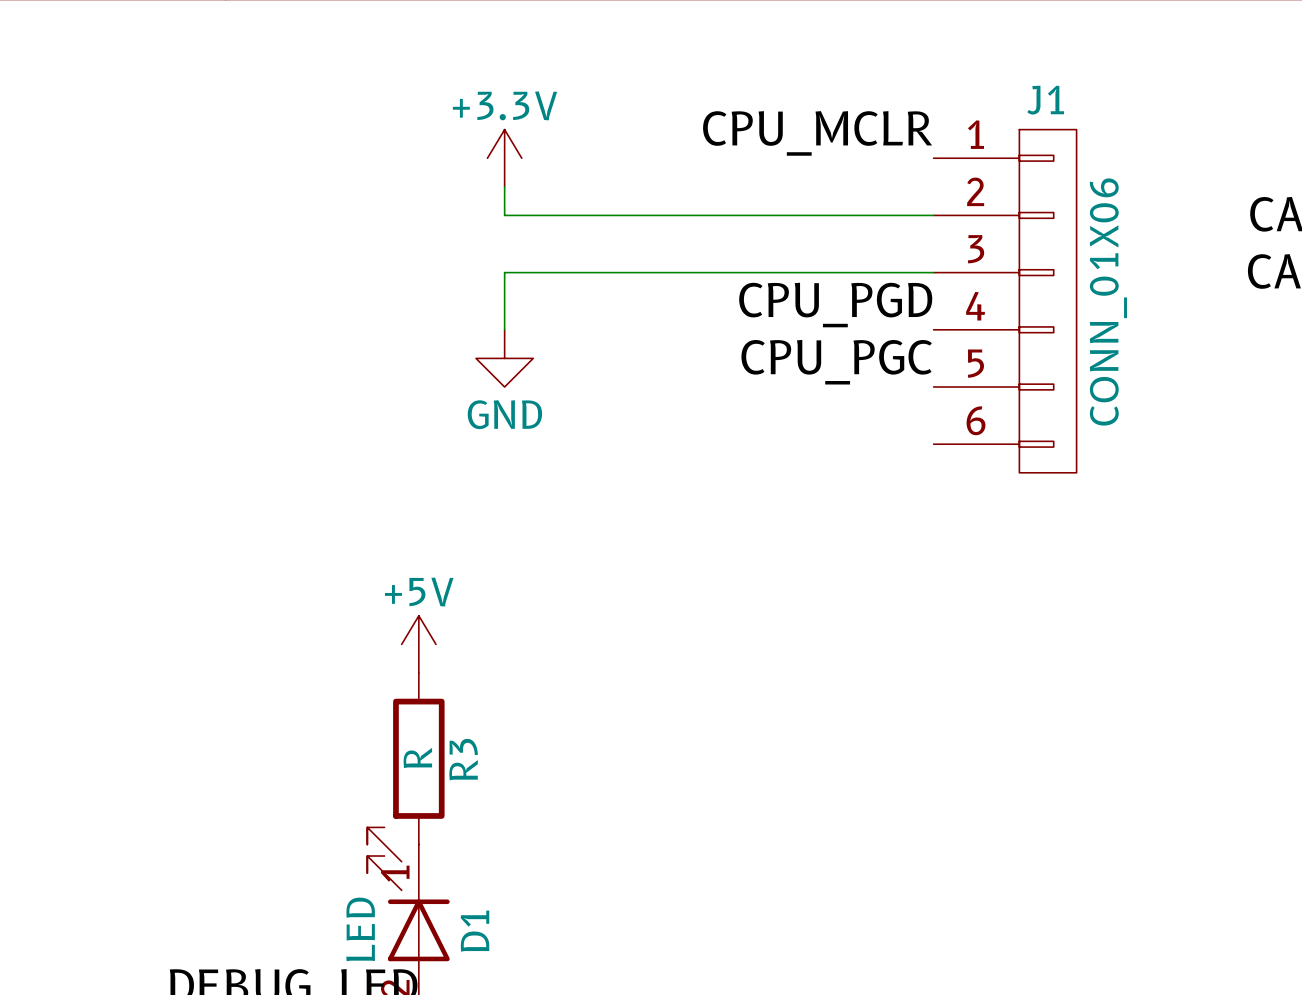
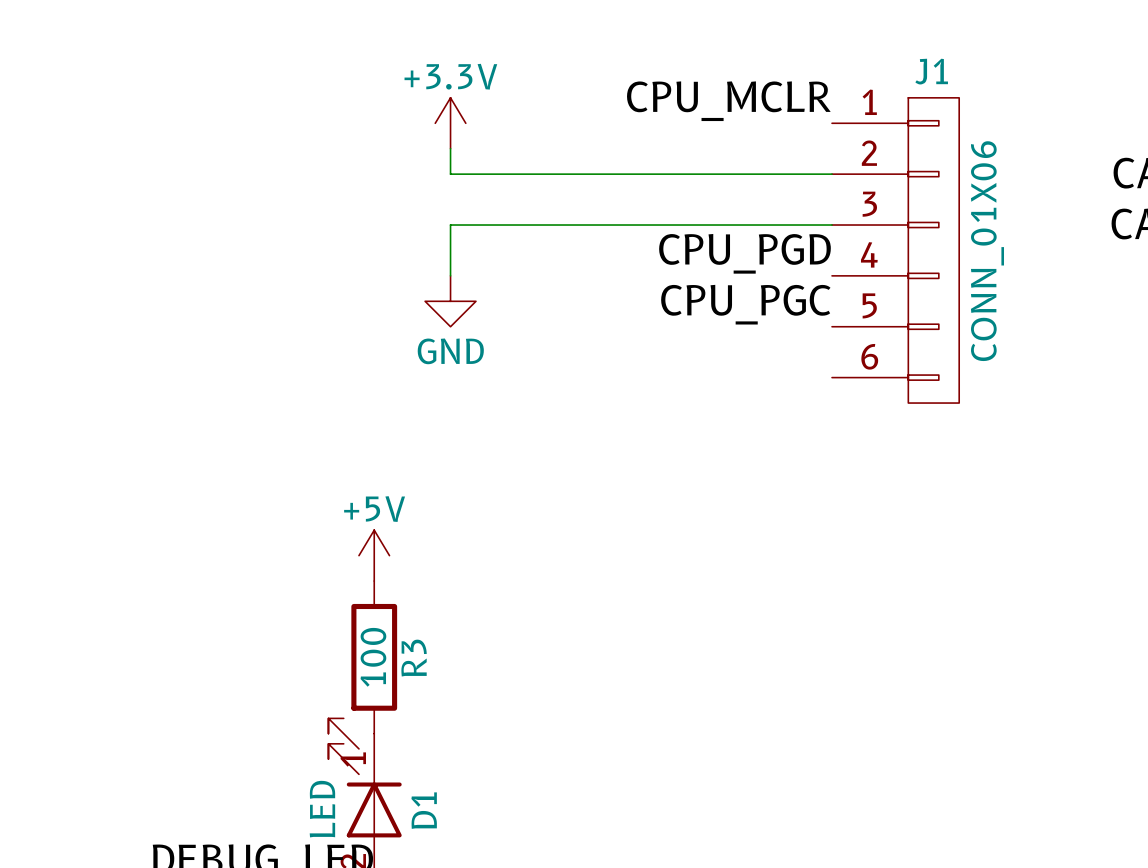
R3 value: R (417, 757) -> 100 (373, 657)

